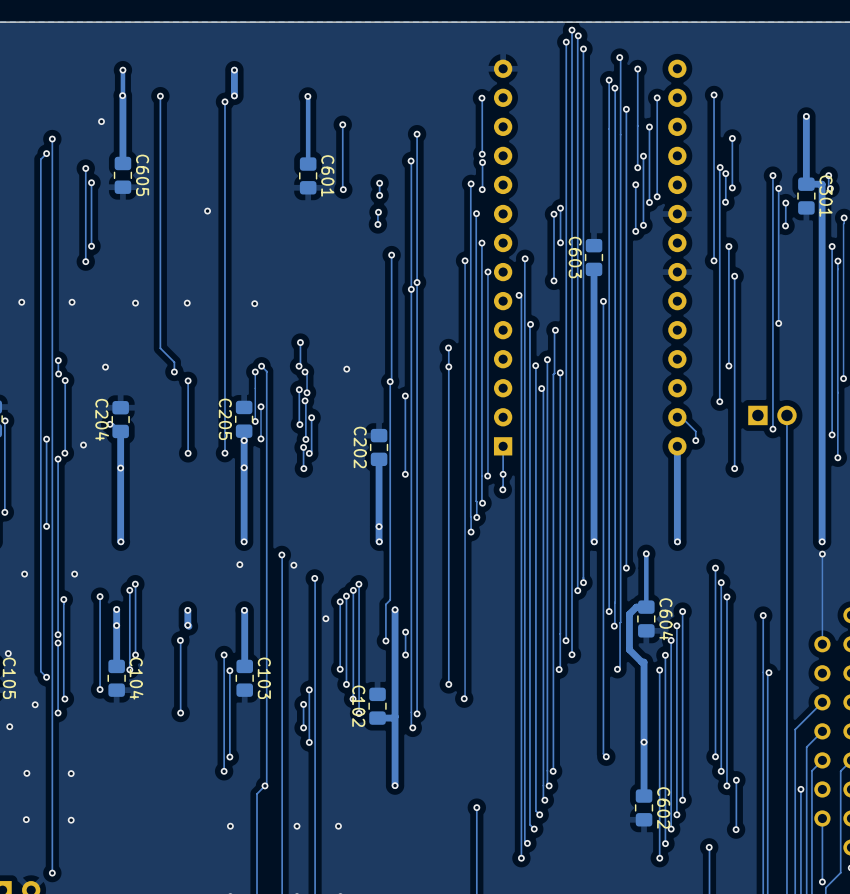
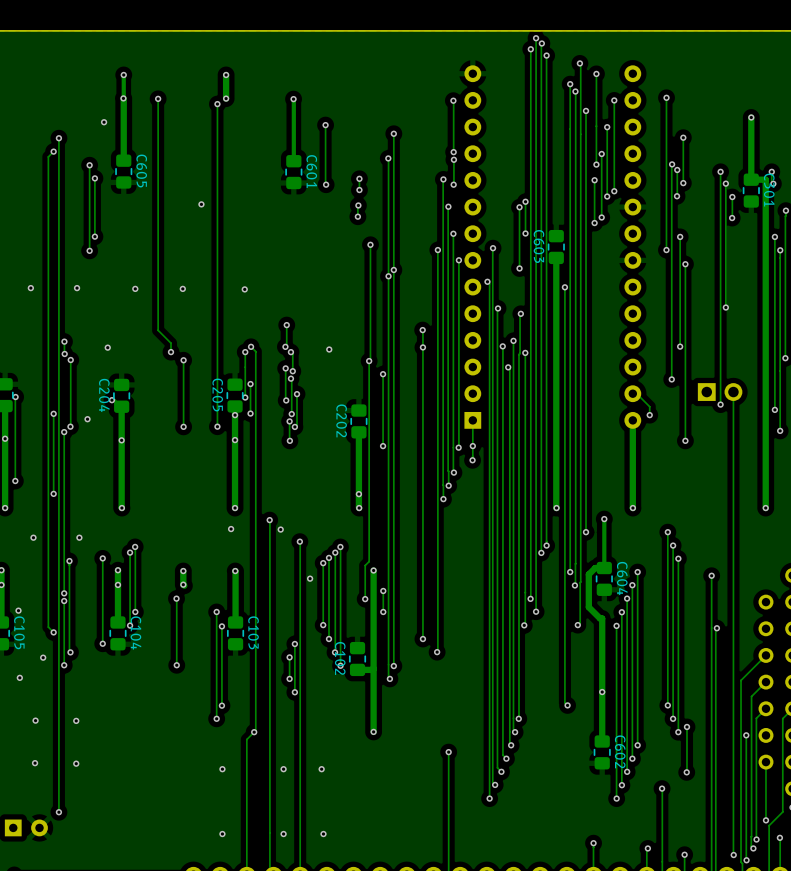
track: (822, 554) (822, 644) -> none
via: (822, 554) -> none

